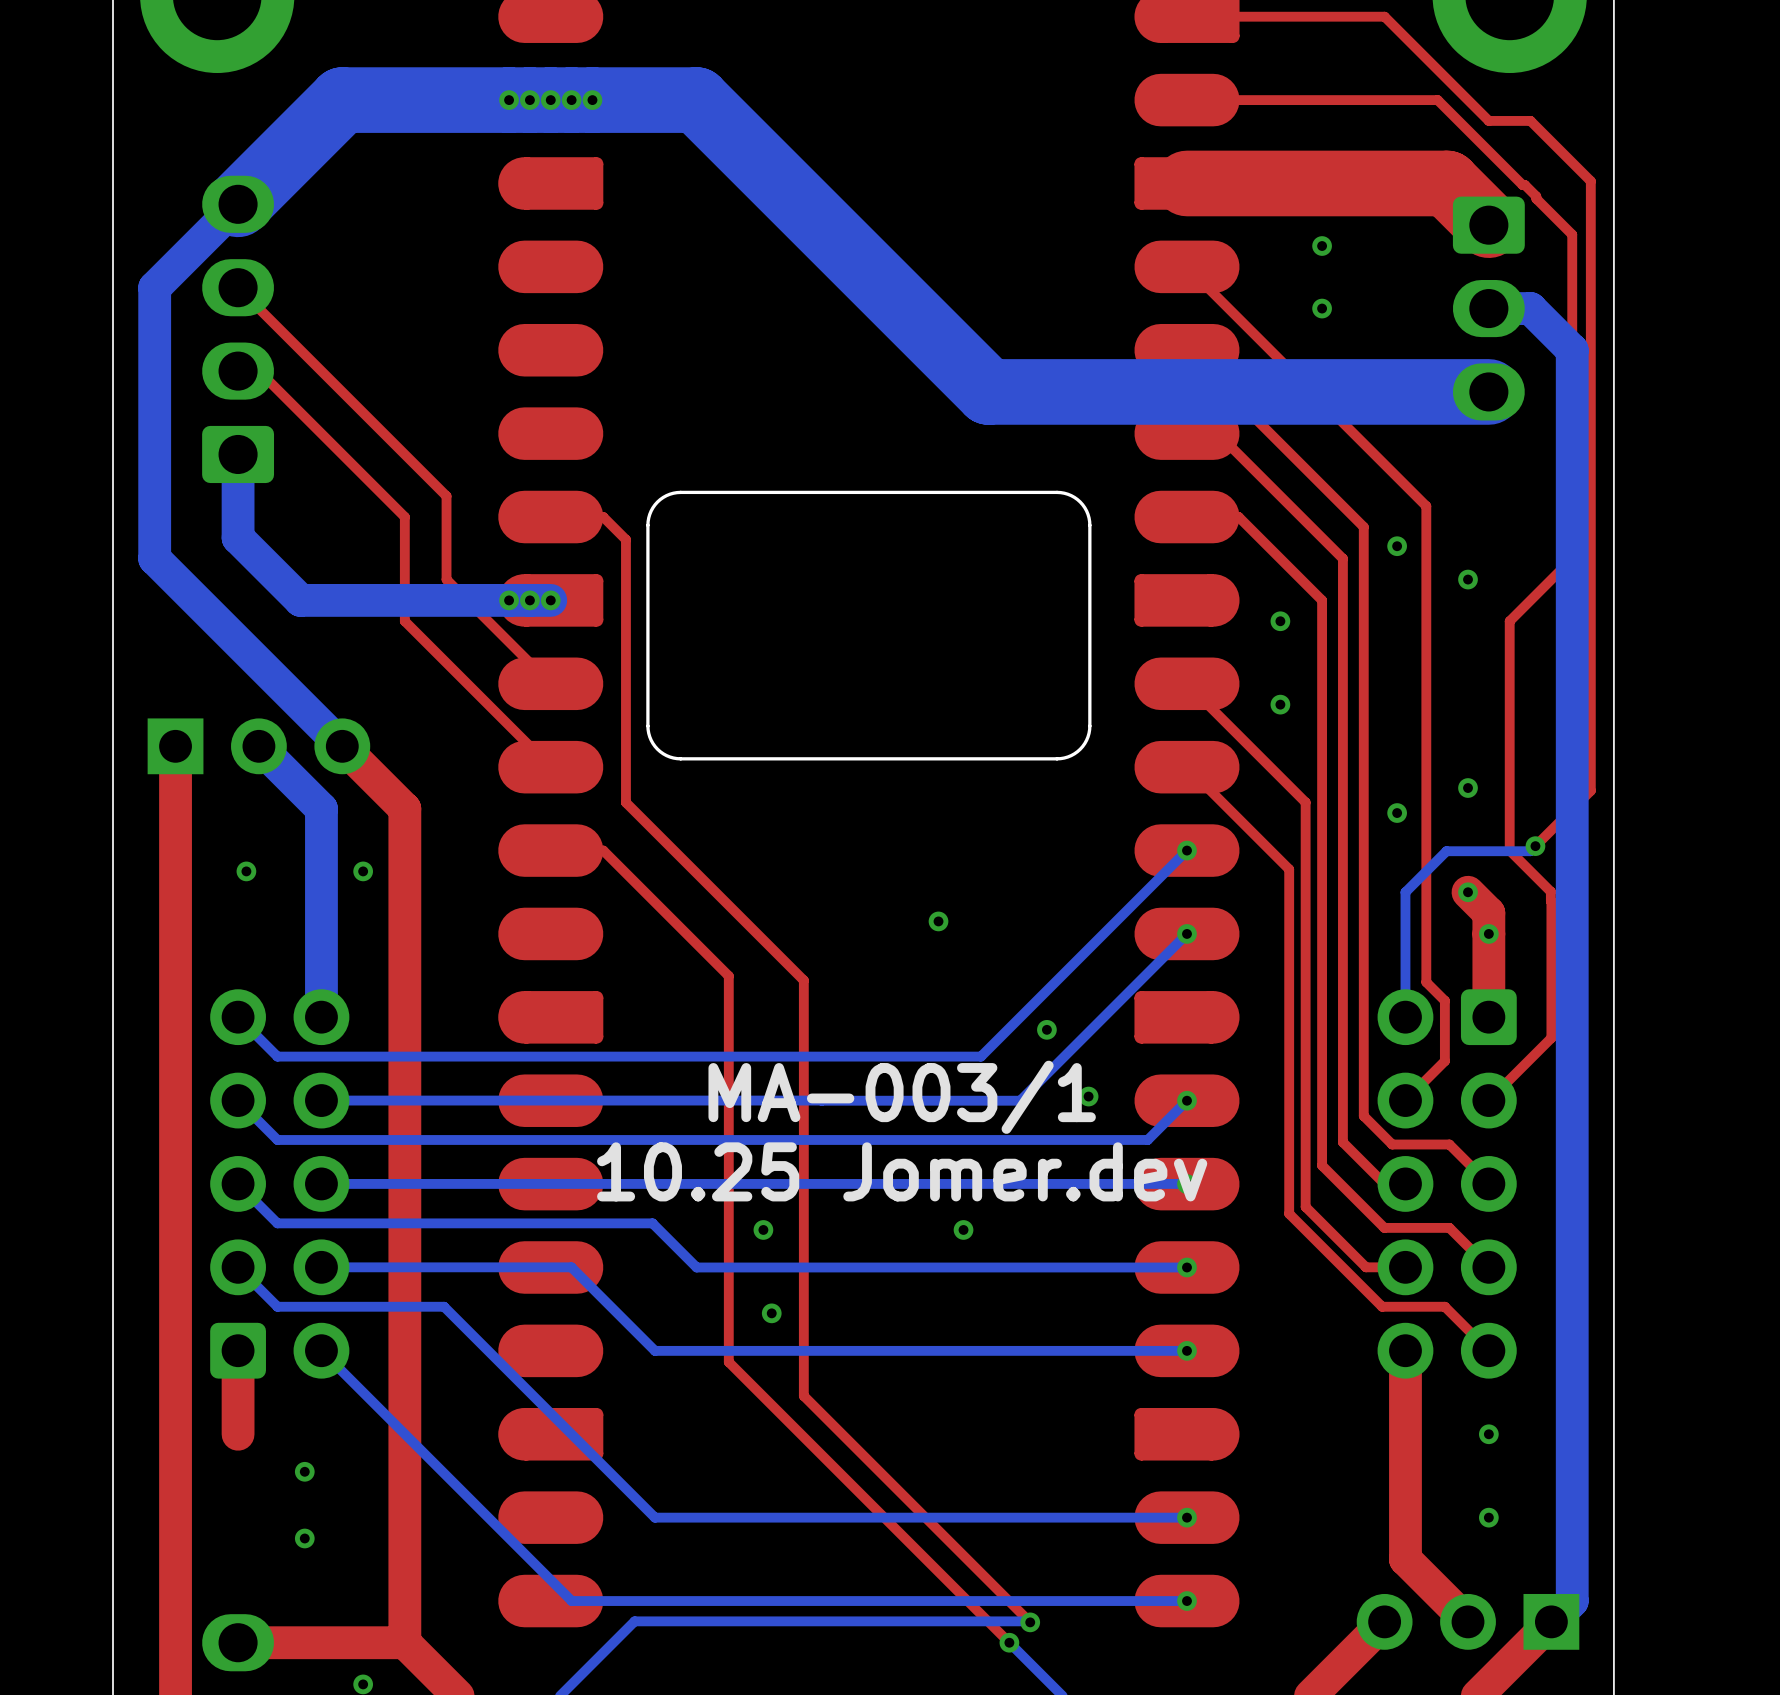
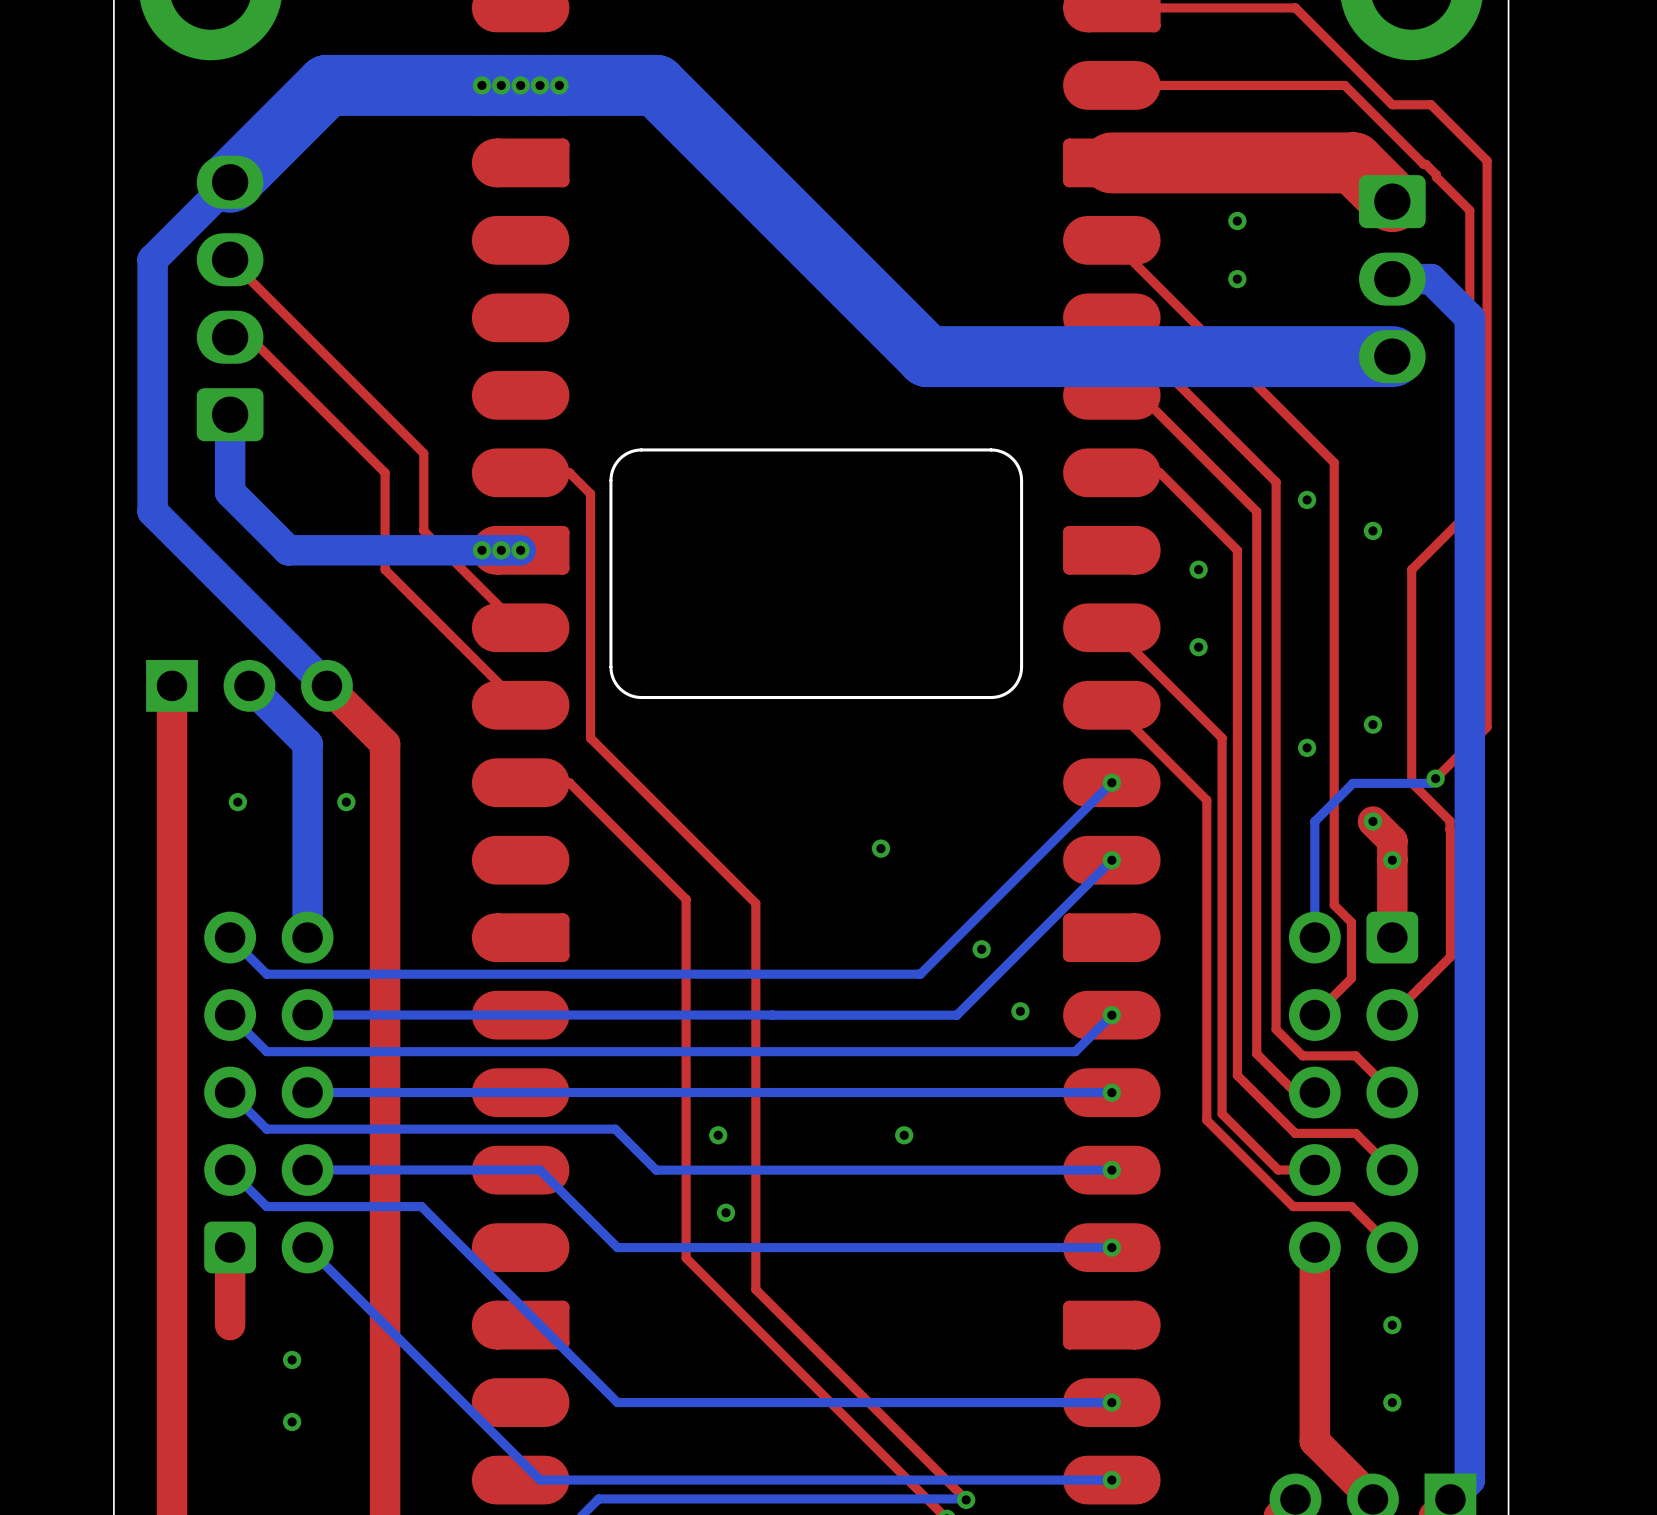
text: MA-003/1 (902, 1097) -> none
text: 10.25 Jomer.dev (902, 1171) -> none

